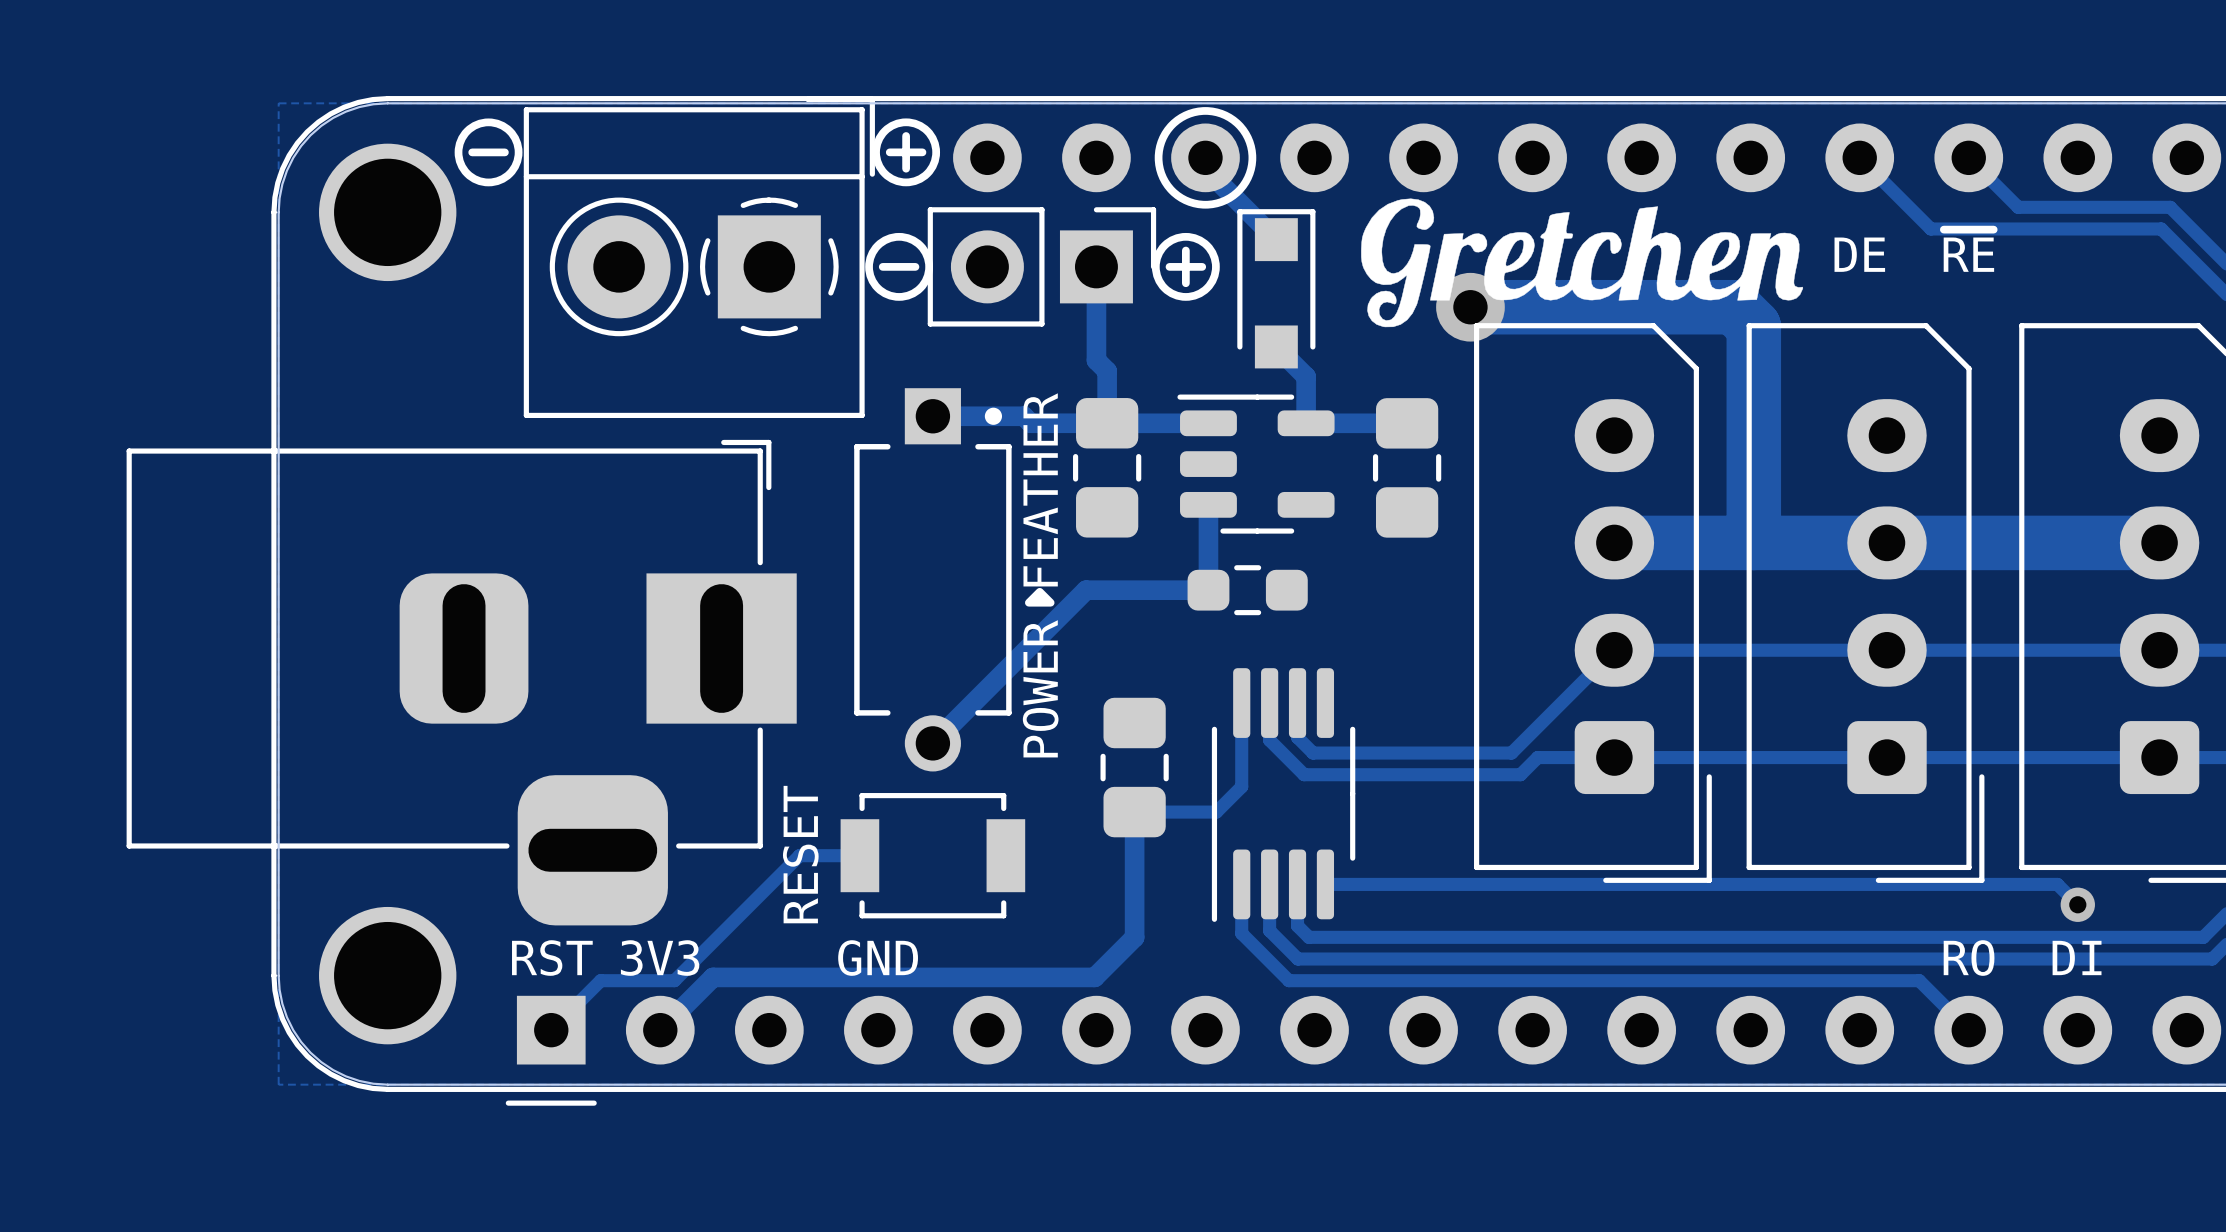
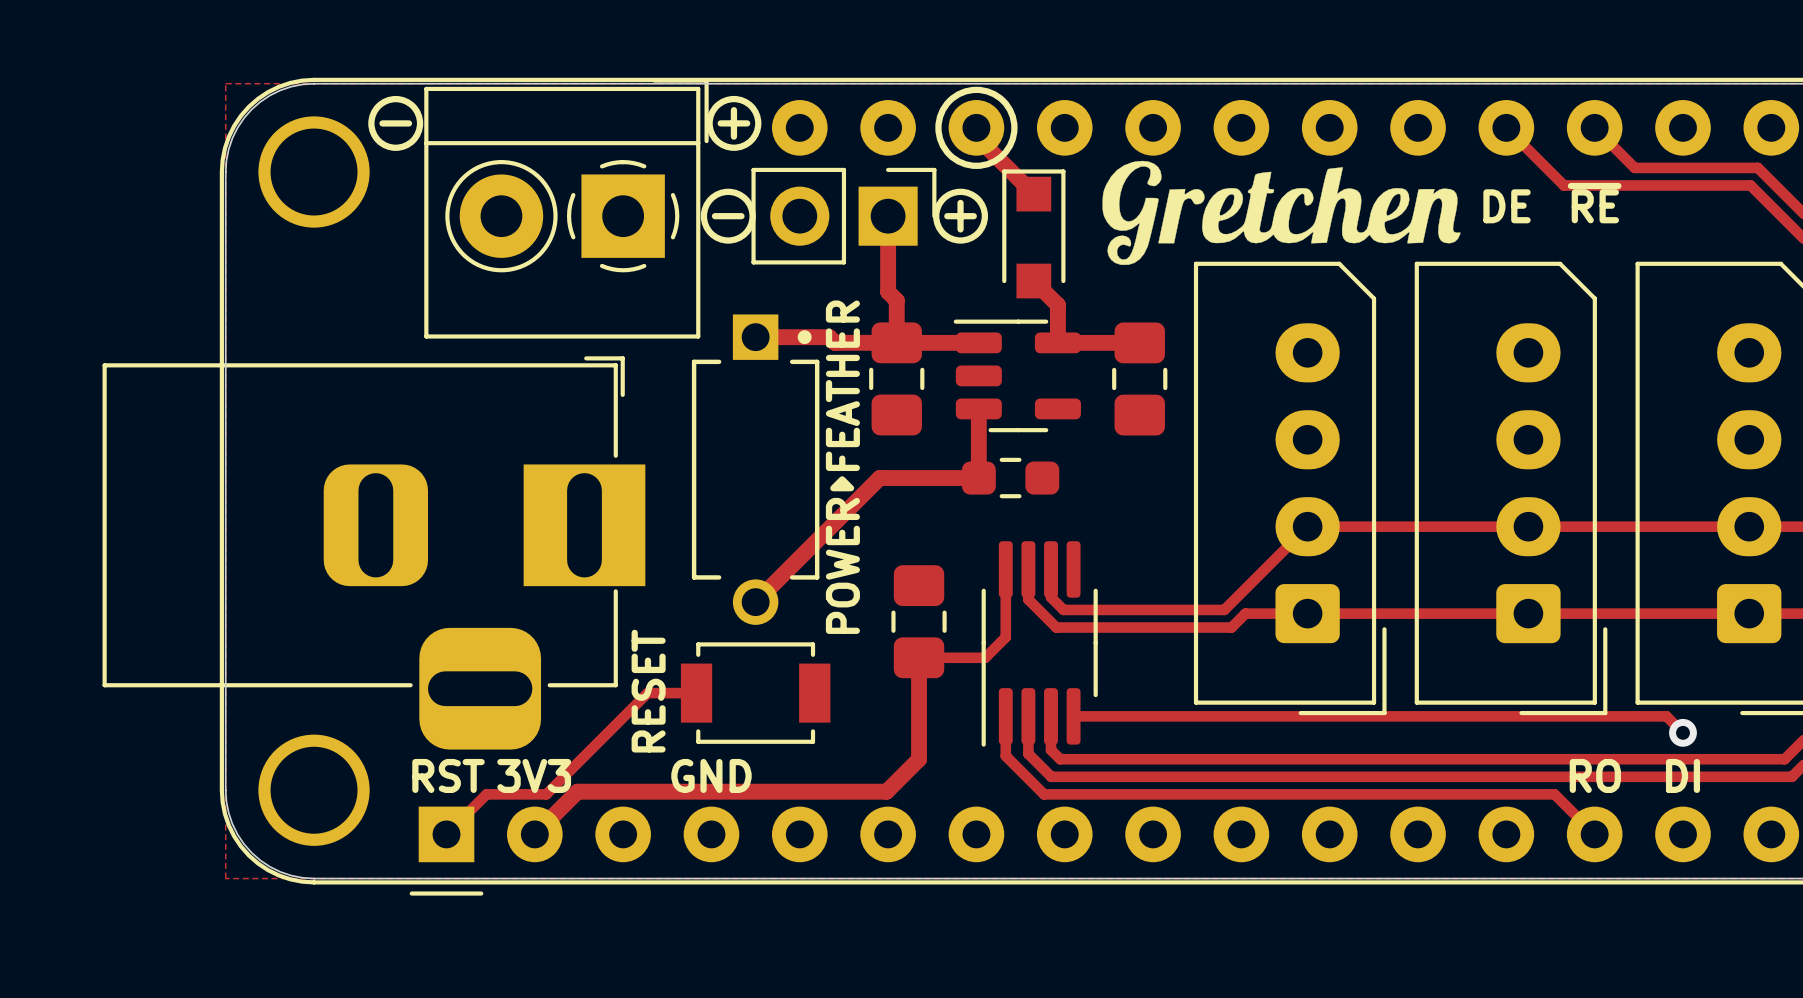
track: (1470, 307) (1734, 307) (1753, 326) (1753, 542) -> none
via: (1470, 307) -> none
track: (1614, 542) (2159, 542) -> none

